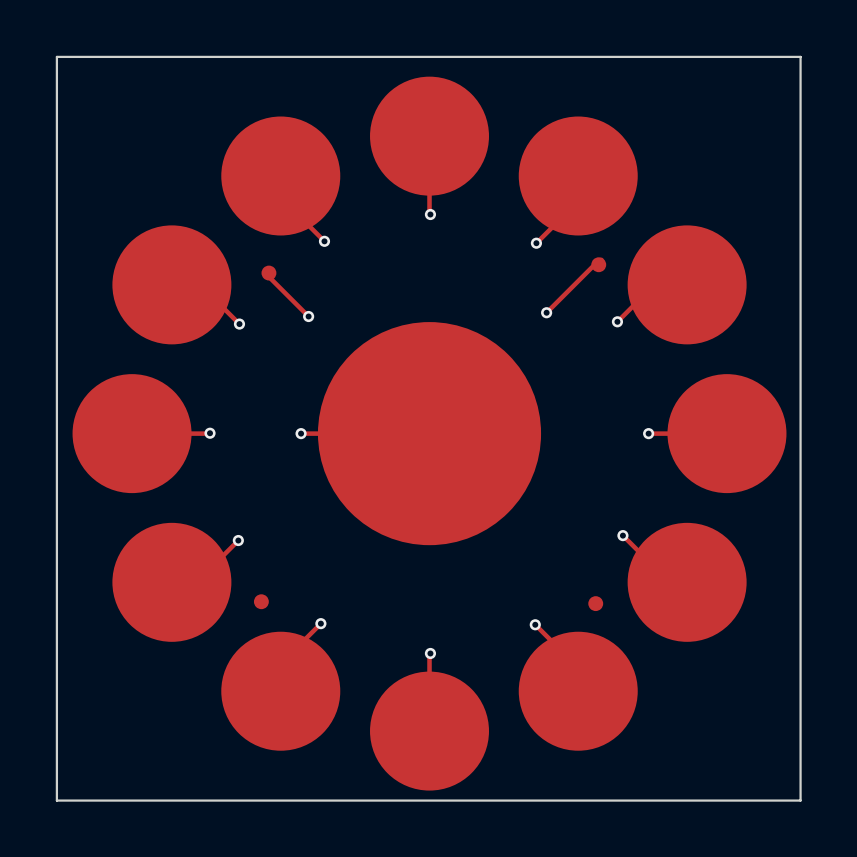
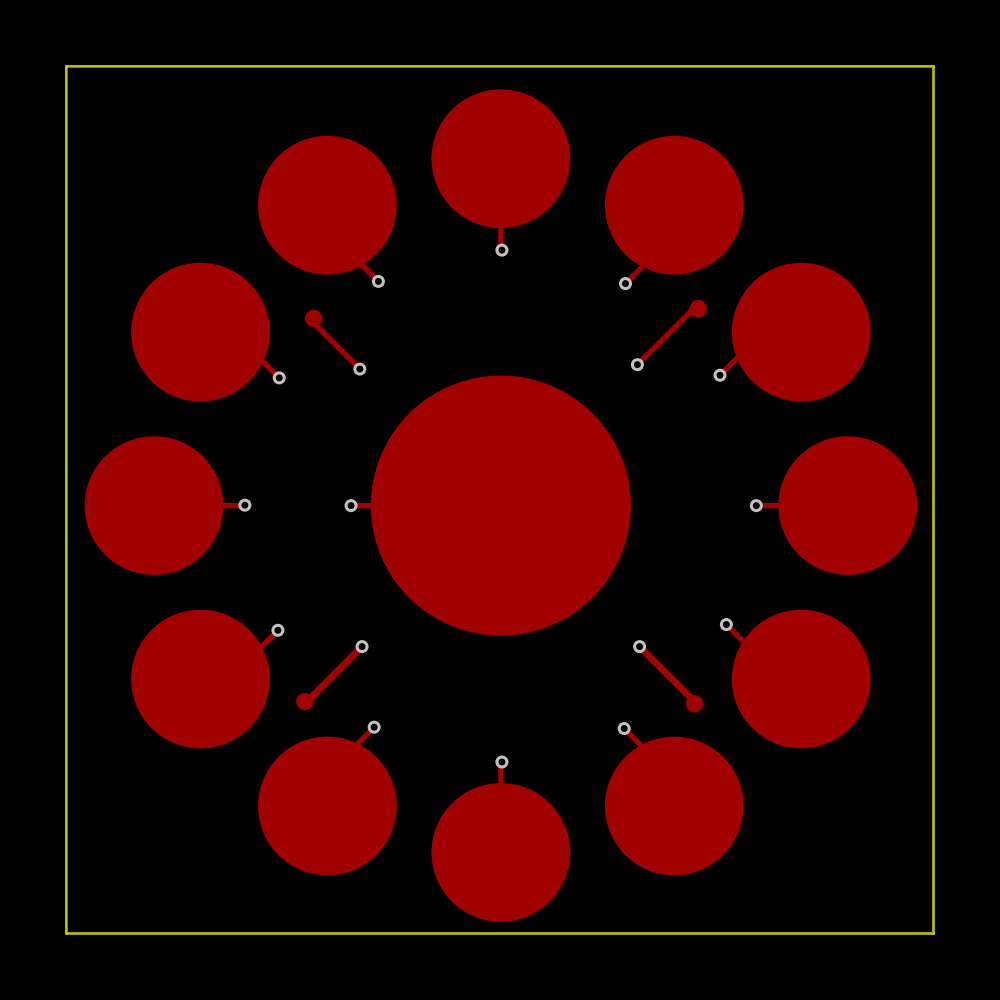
track: none -> (362, 646) (307, 701) (304, 701)
via: none -> (362, 646)
track: none -> (639, 646) (694, 701) (694, 703)
via: none -> (639, 646)

